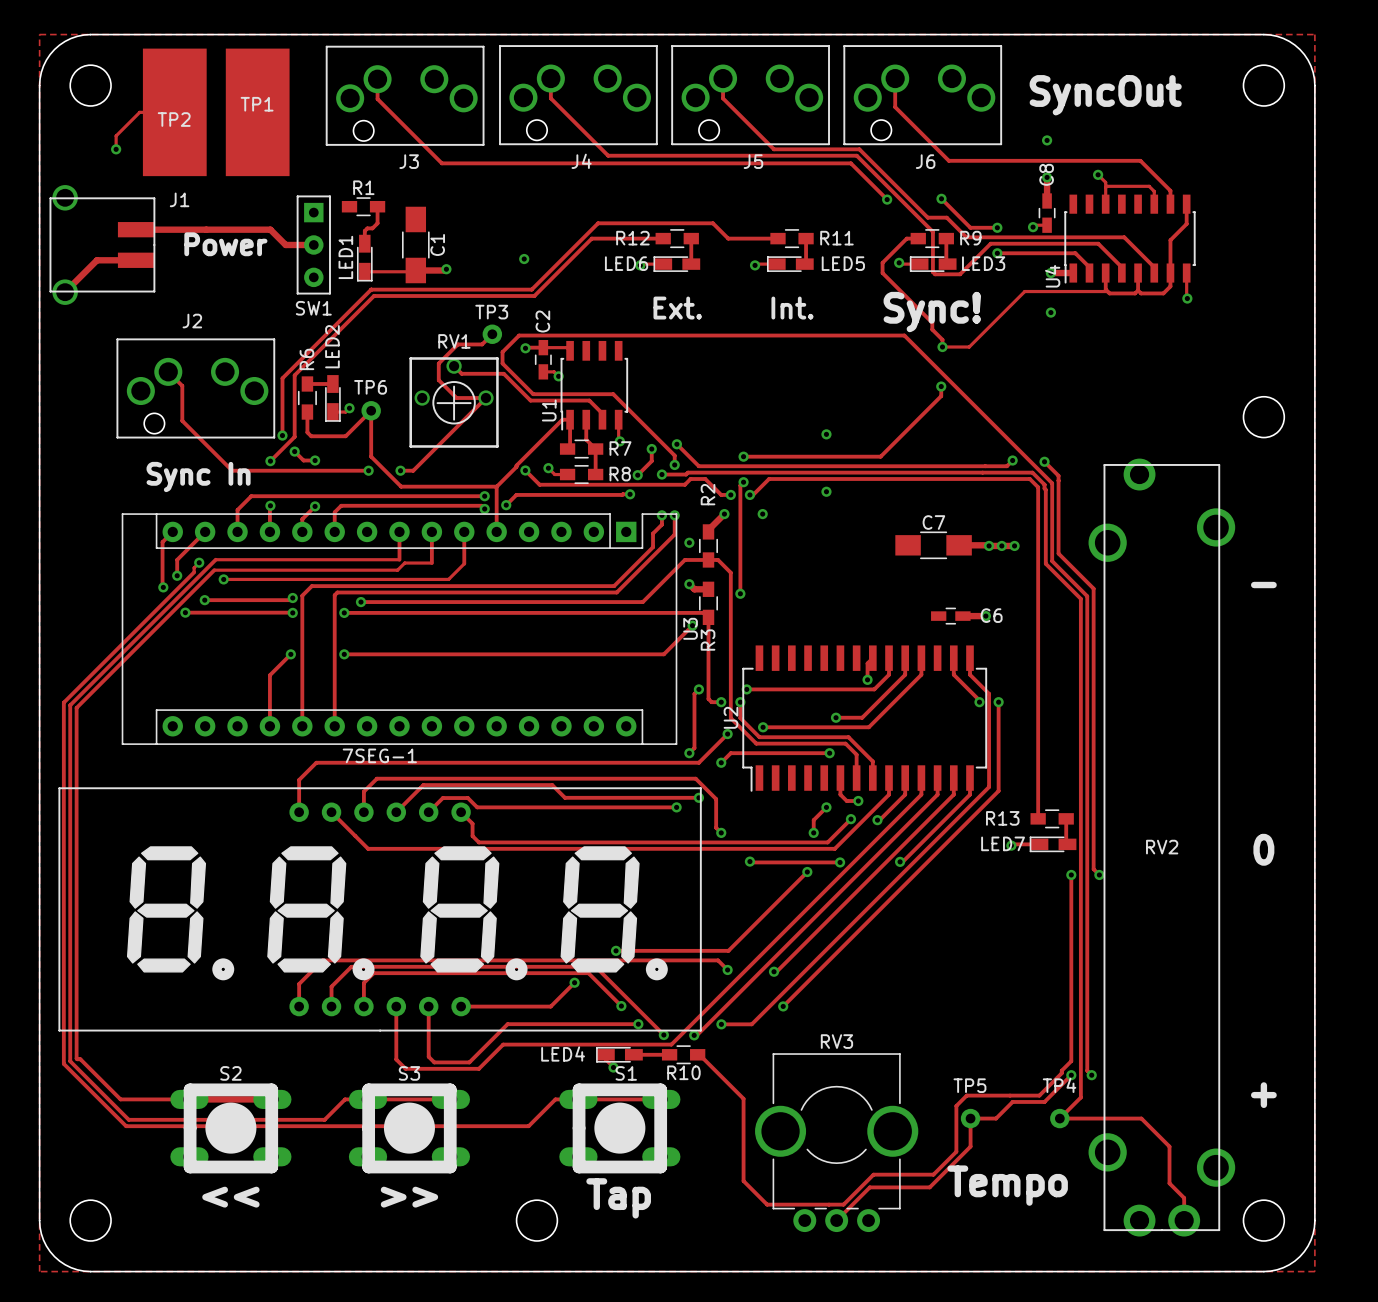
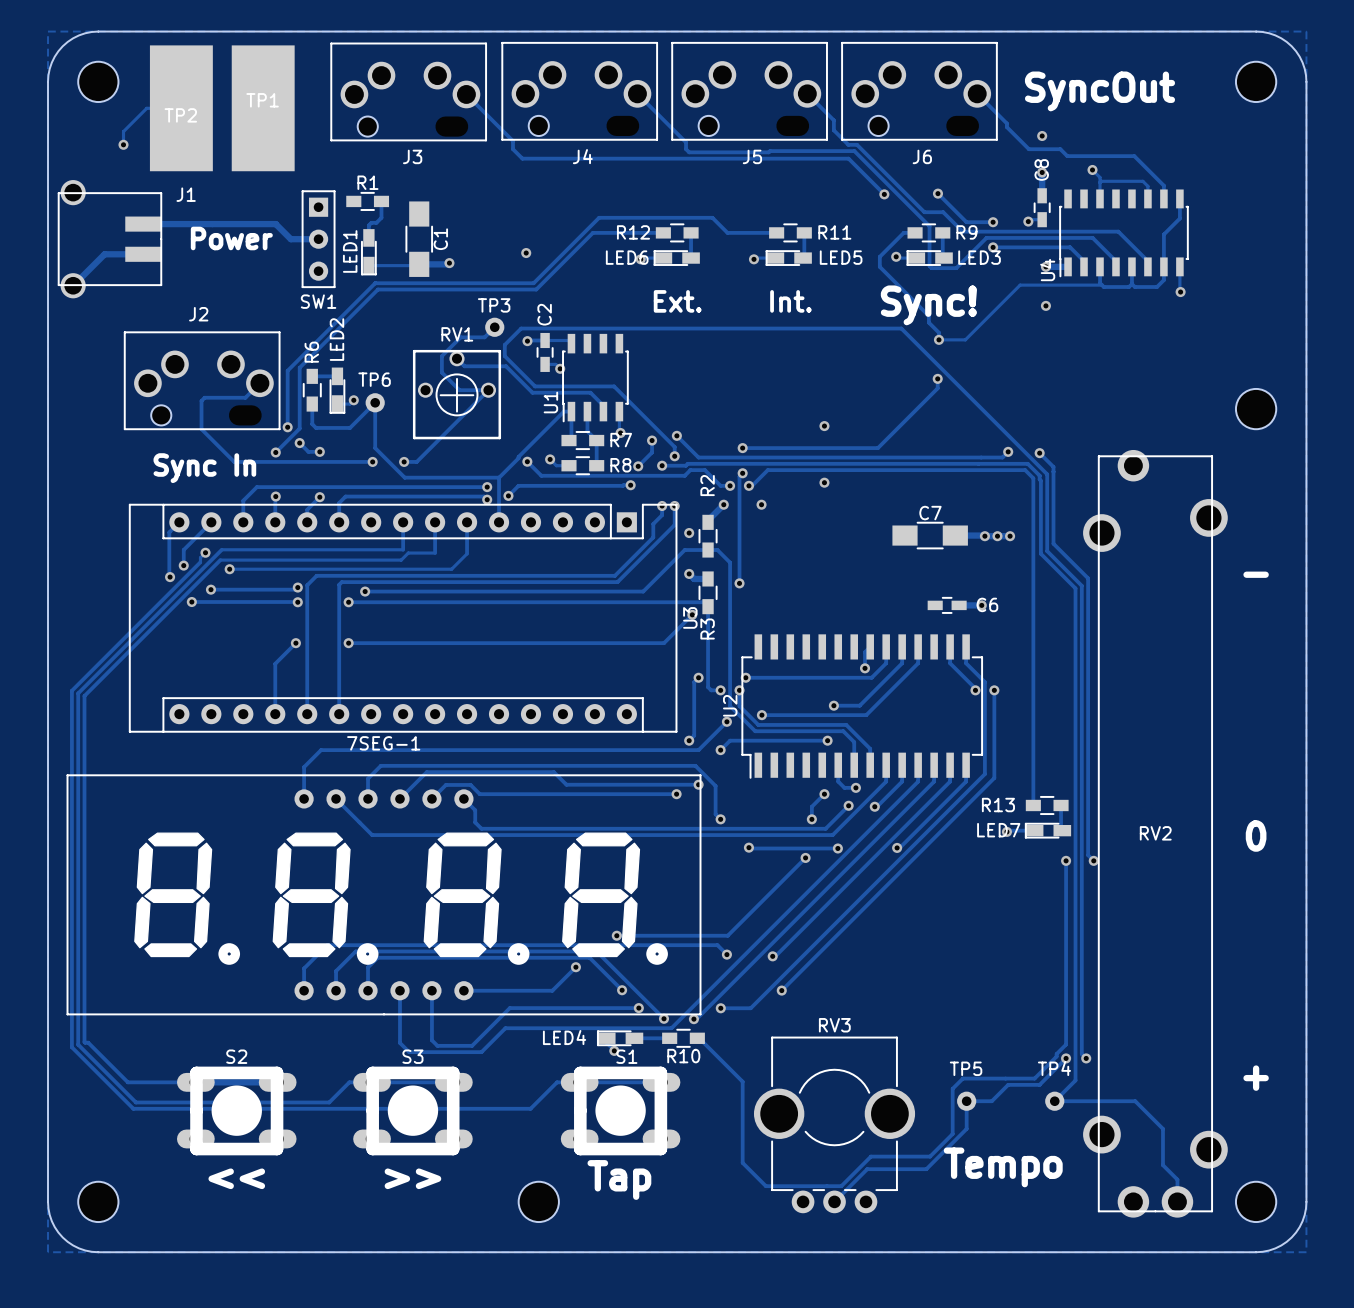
track: (550, 78) (550, 98) (608, 155) (771, 155) -> (637, 93) (686, 142) (686, 149) (689, 152) (770, 151)
track: (723, 78) (723, 98) (773, 149) (850, 149) -> (807, 93) (833, 120) (833, 130) (848, 144)
track: (895, 78) (895, 107) (948, 160) (1072, 160) -> (977, 93) (1028, 149) (1060, 149) (1067, 156)
track: (377, 79) (377, 99) (441, 163) (520, 163) -> (466, 94) (512, 141) (512, 149) (522, 158)
track: (168, 371) (182, 385) (182, 420) (232, 470) -> (259, 383) (245, 397) (204, 397) (201, 400) (201, 429) (234, 461) (238, 461)

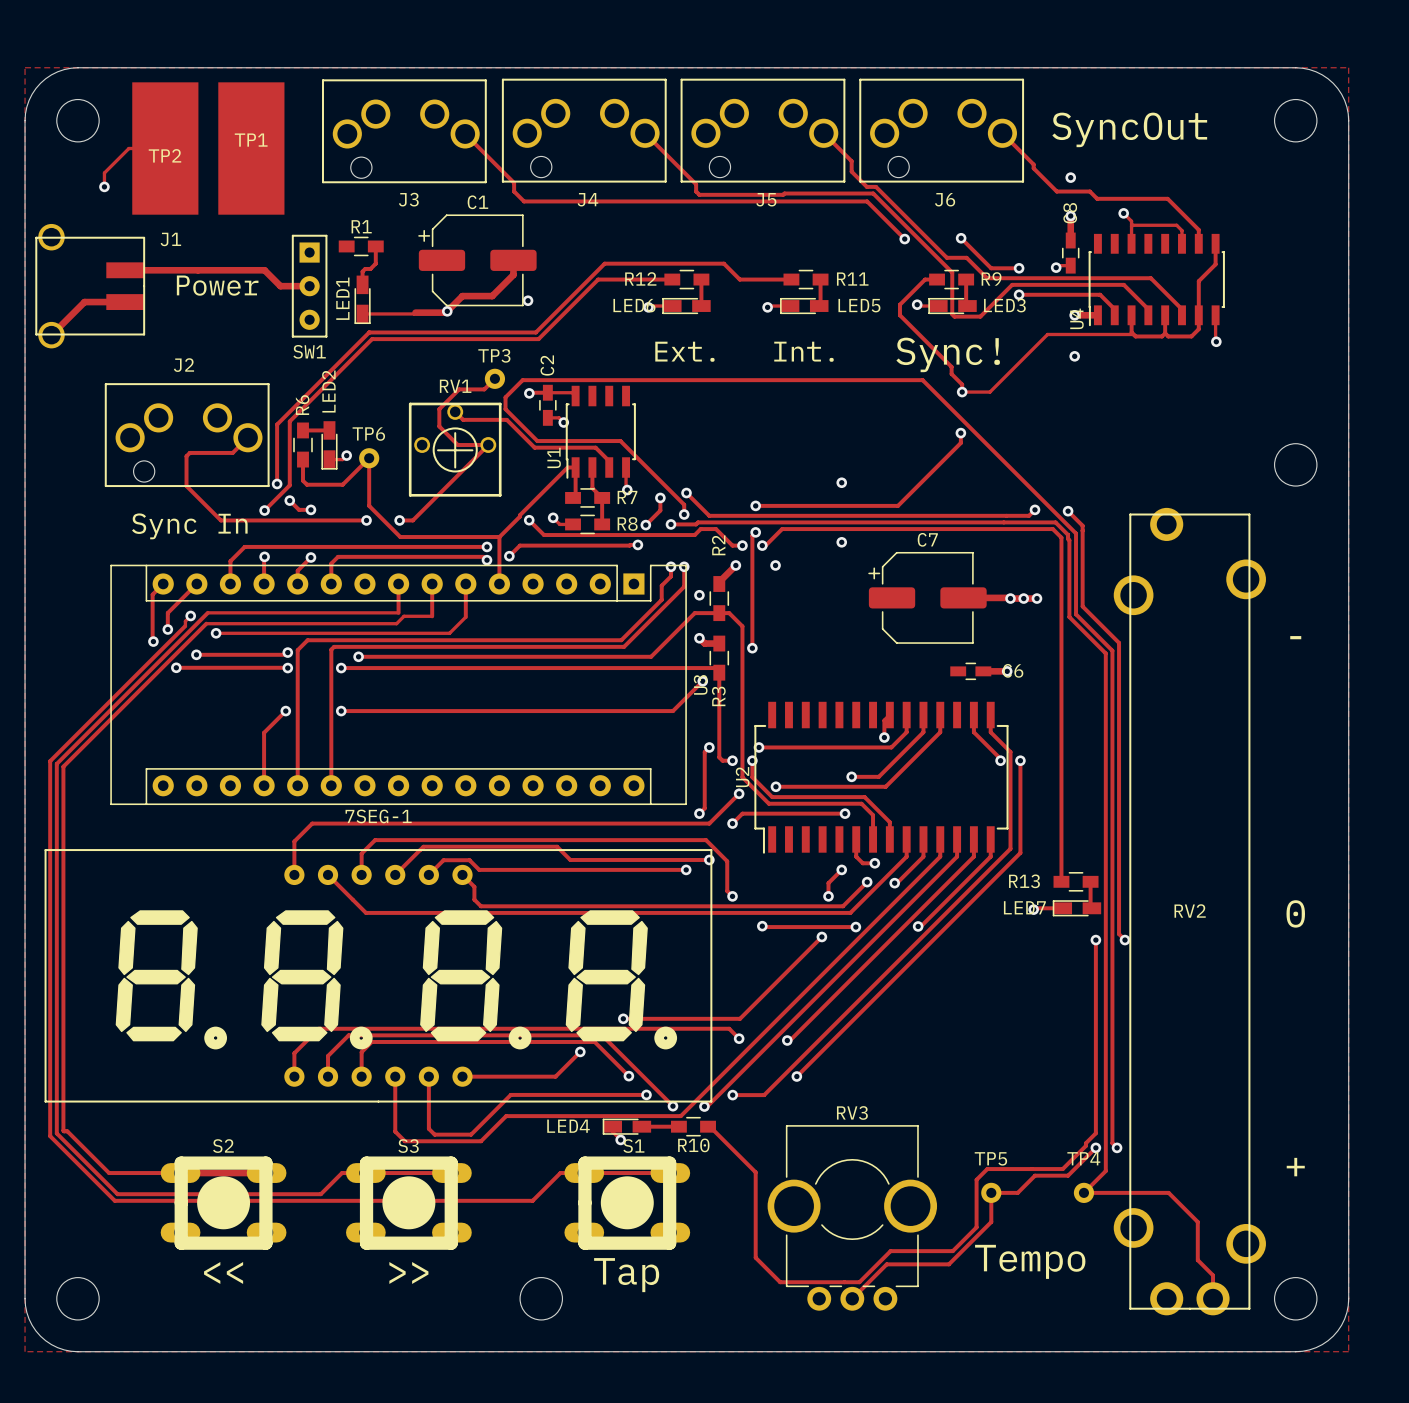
C1 footprint: [405, 201, 433, 277] -> [418, 214, 537, 307]
track: none -> (513, 260) (513, 274) (492, 296) (462, 296) (447, 311)
C1 name position: C1 (440, 239) -> C1 (477, 202)
C7 name position: C7 (930, 513) -> C7 (927, 539)
C7 footprint: [892, 521, 968, 550] -> [868, 551, 987, 644]

